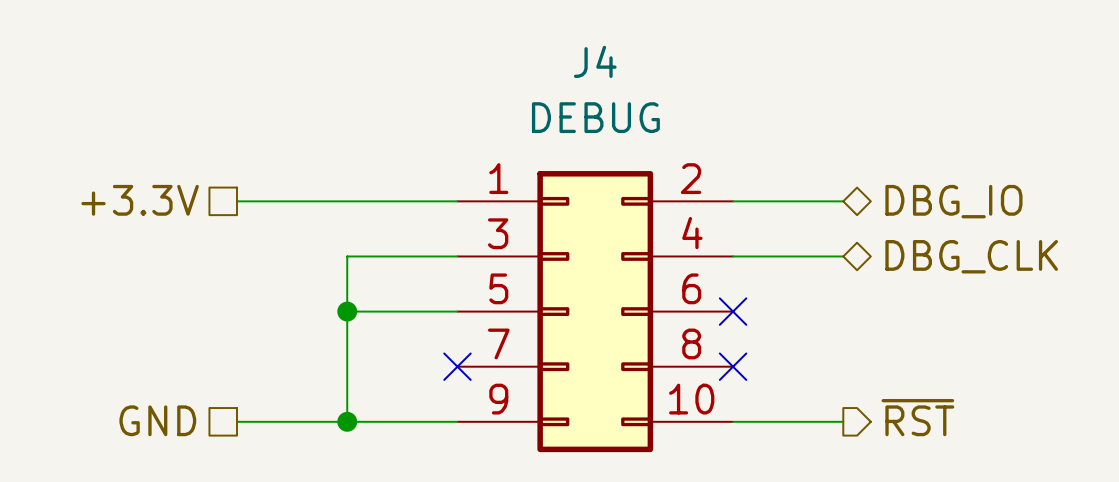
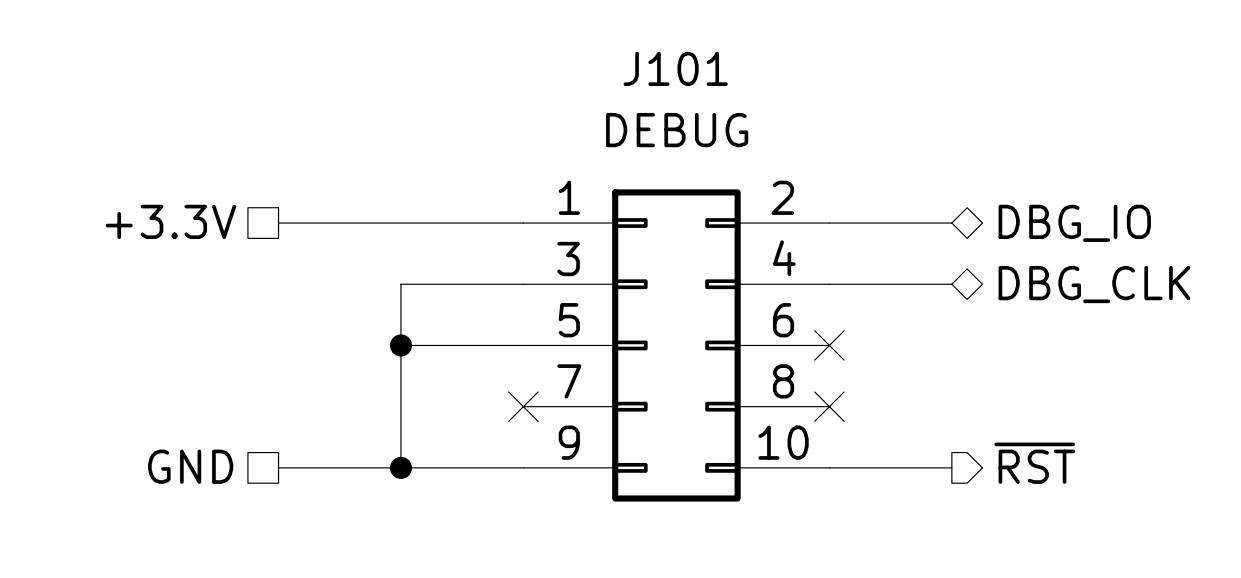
J4 name: J4 (595, 61) -> J101 (675, 68)

